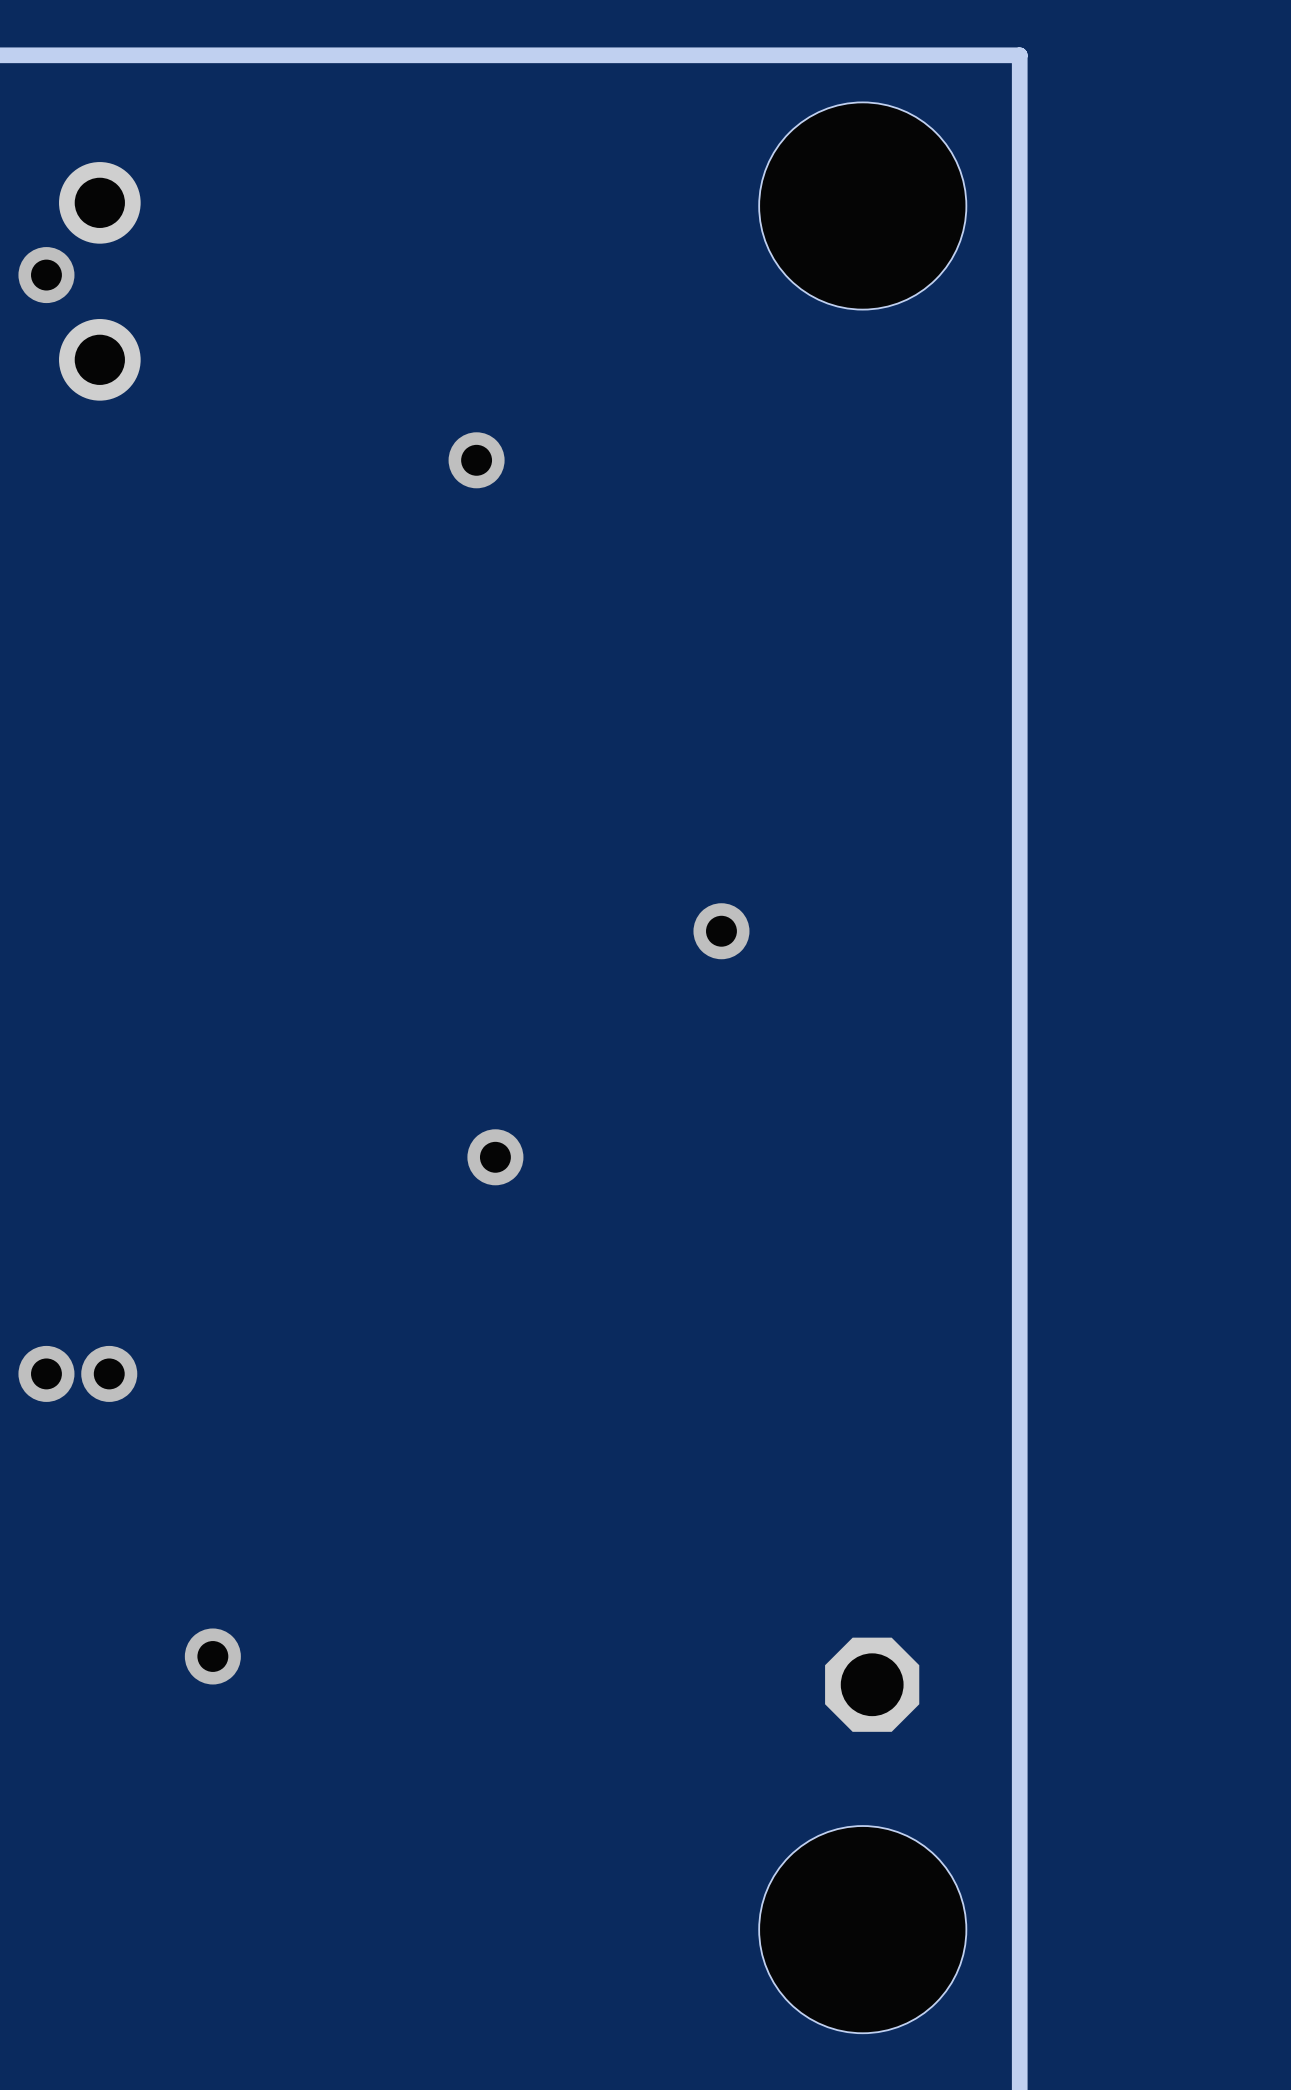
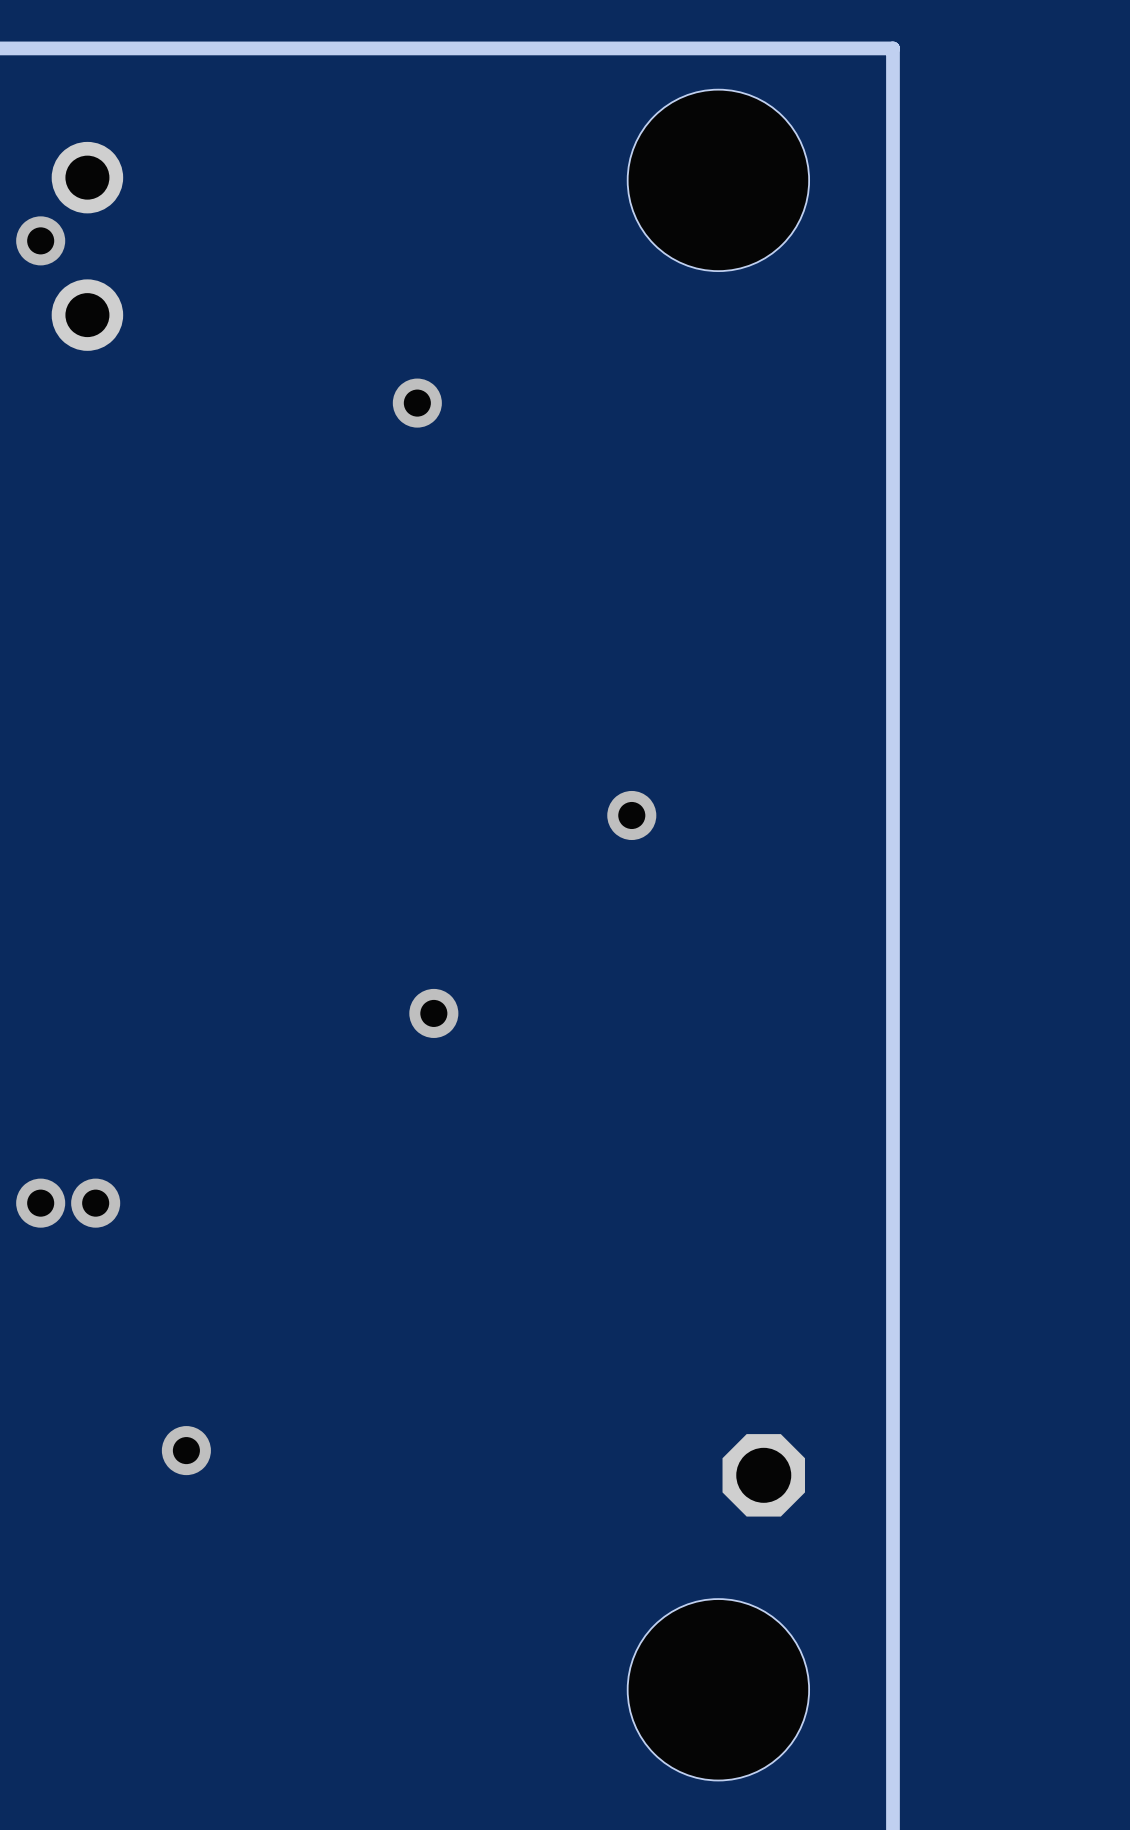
hole position: (862, 205) -> (718, 180)
hole position: (862, 1929) -> (718, 1689)

